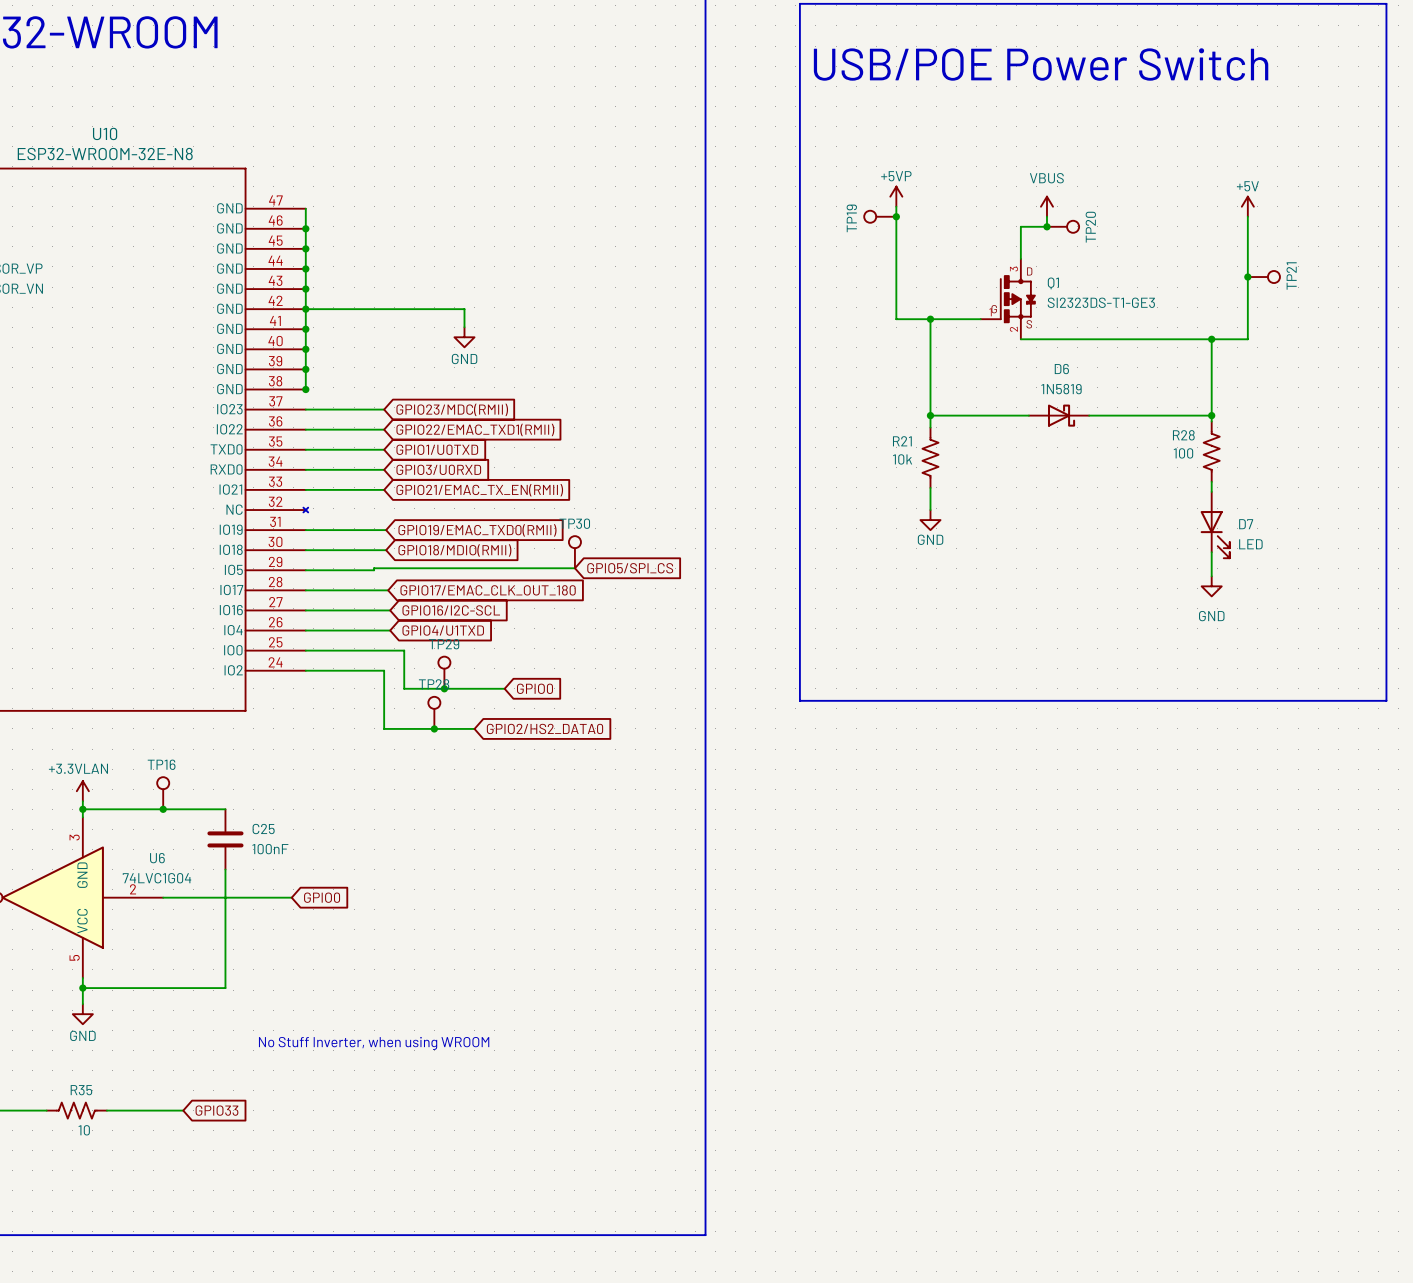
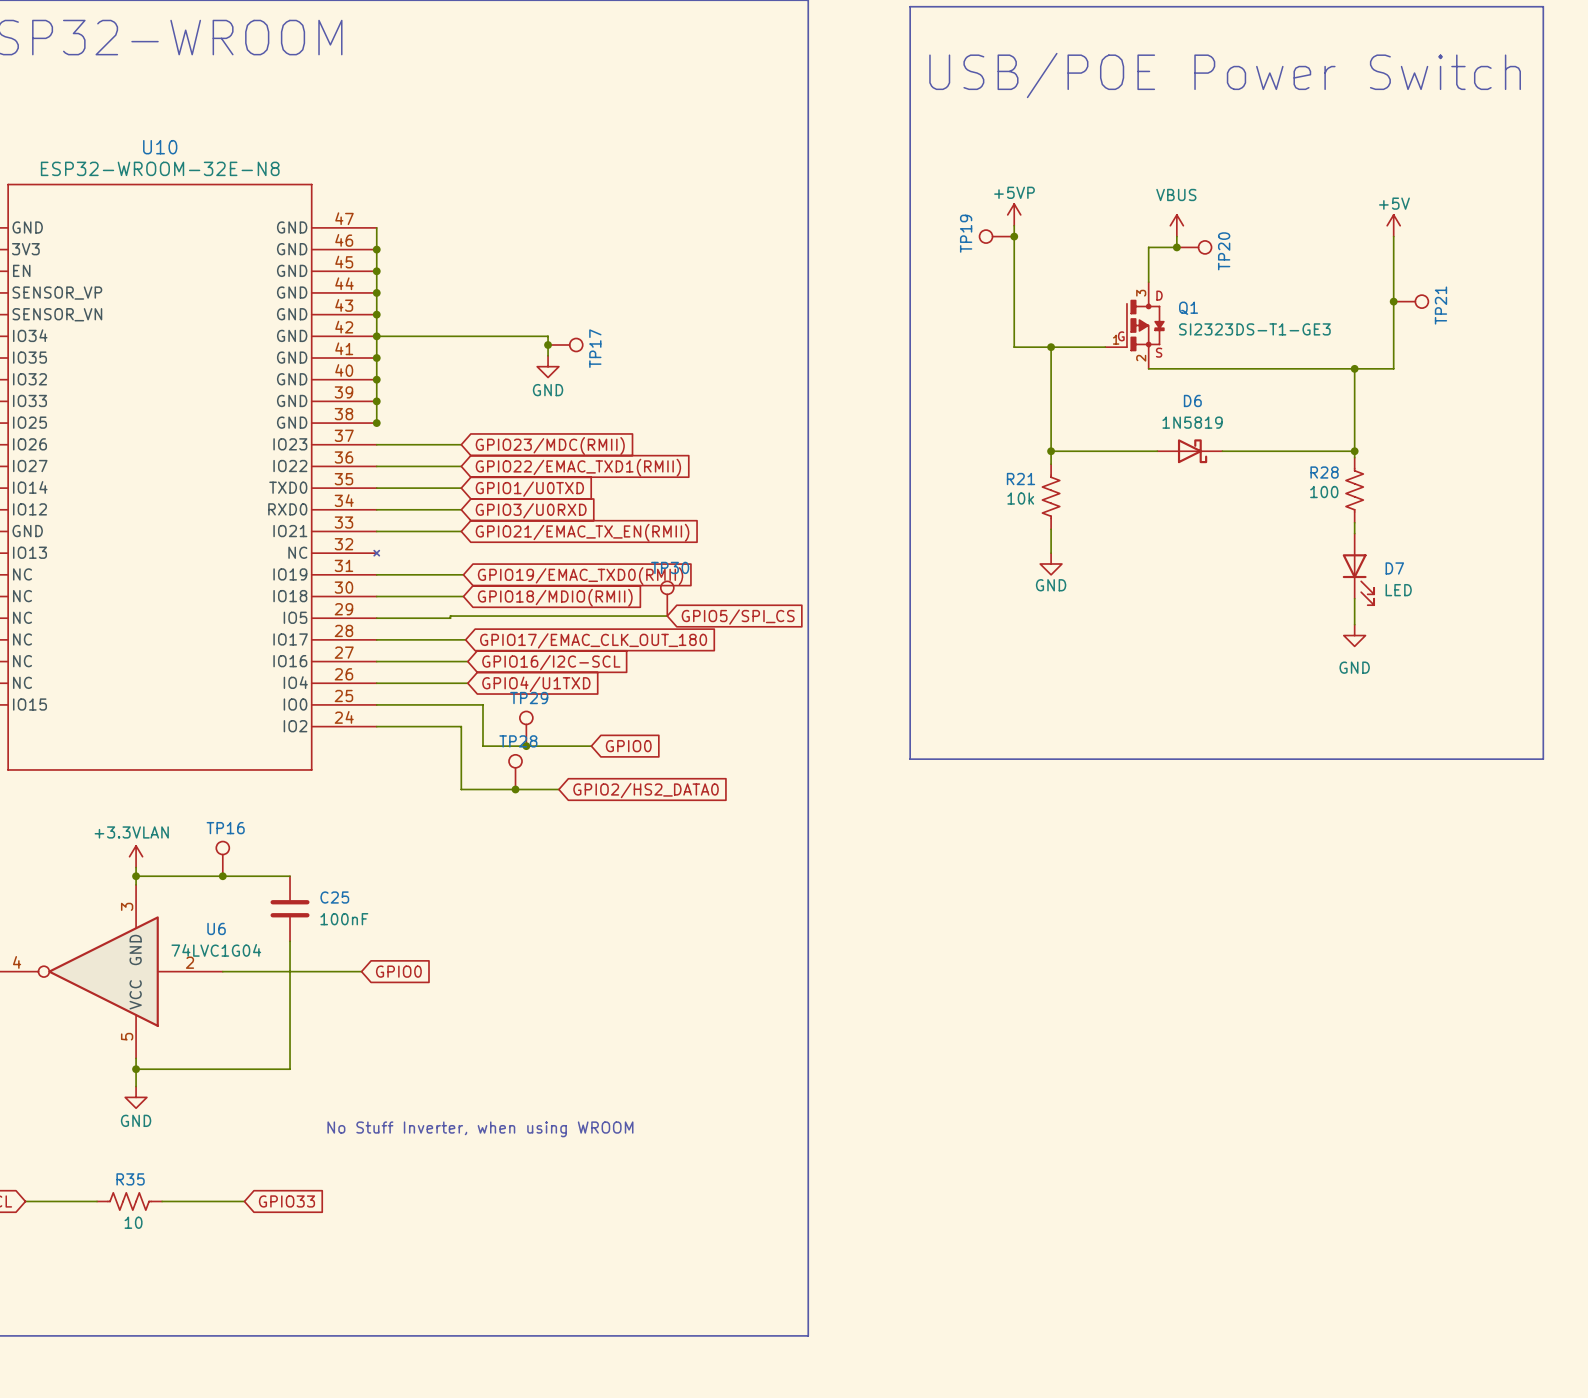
junction: none -> (548, 344)
TP17: none -> (565, 344)

